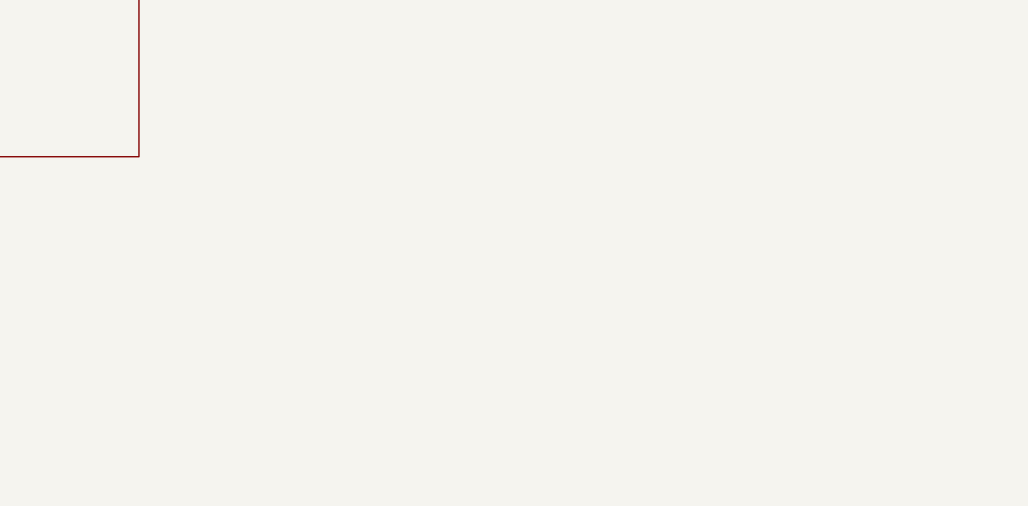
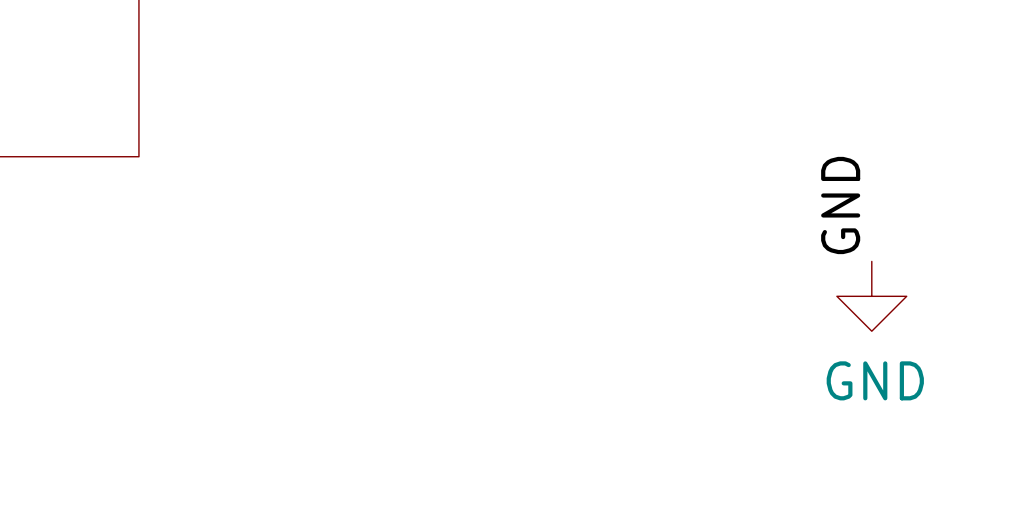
label: none -> GND (840, 205)
power symbol: none -> GND (871, 296)

